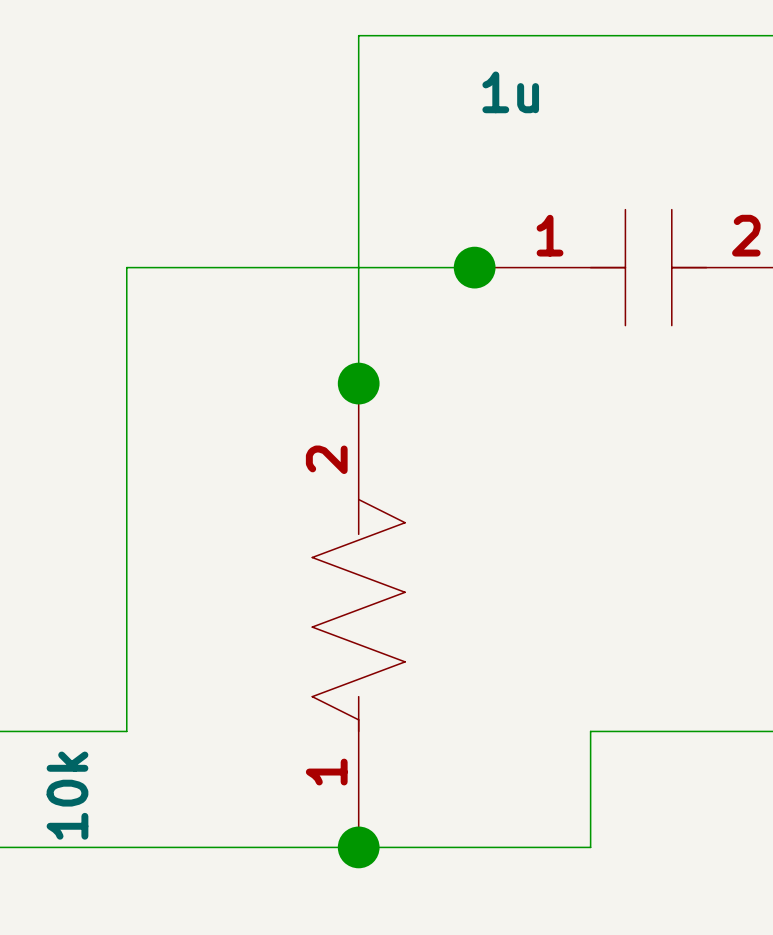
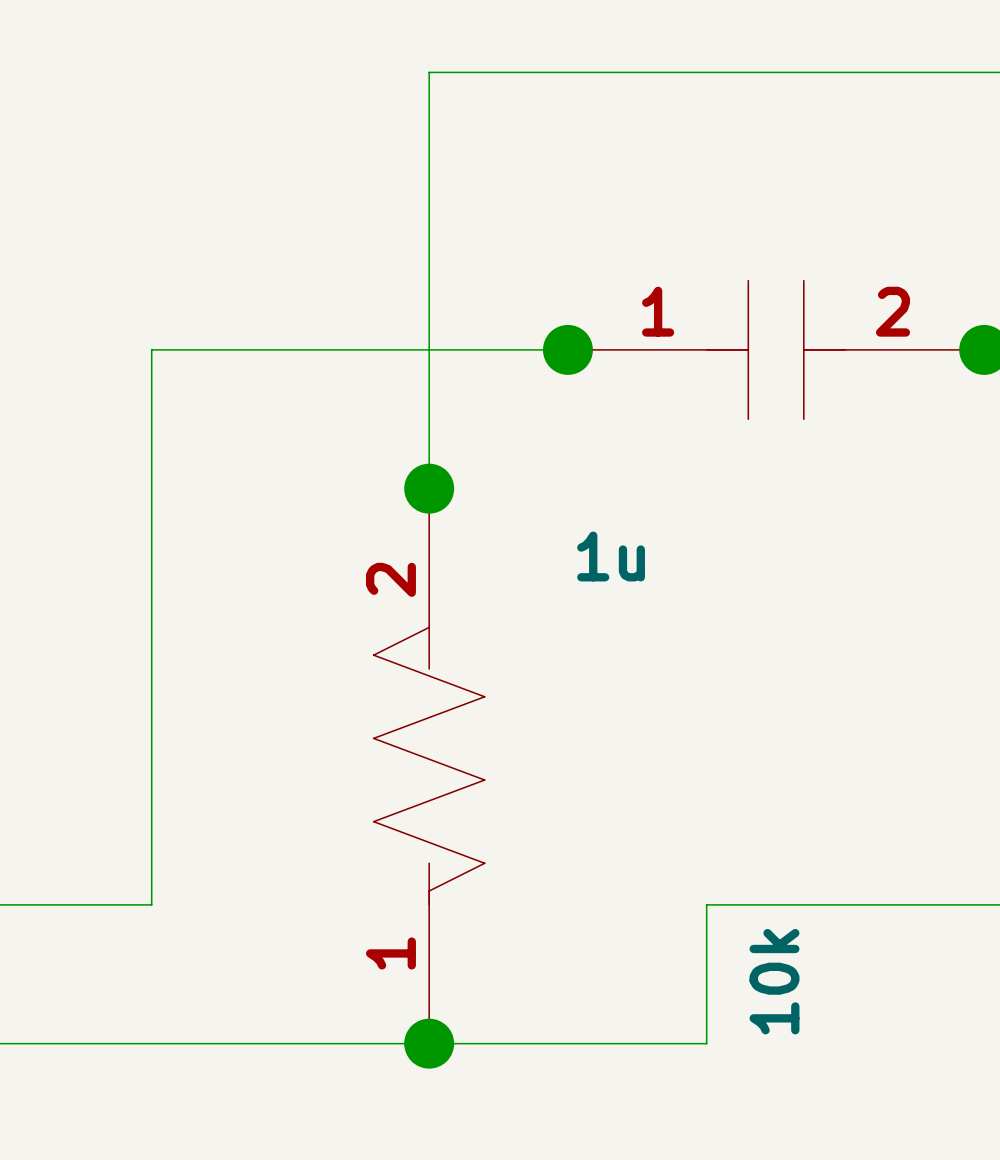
part value position: 1u (510, 92) -> 1u (611, 556)
part flip: as is (358, 615) -> left-right (429, 766)

